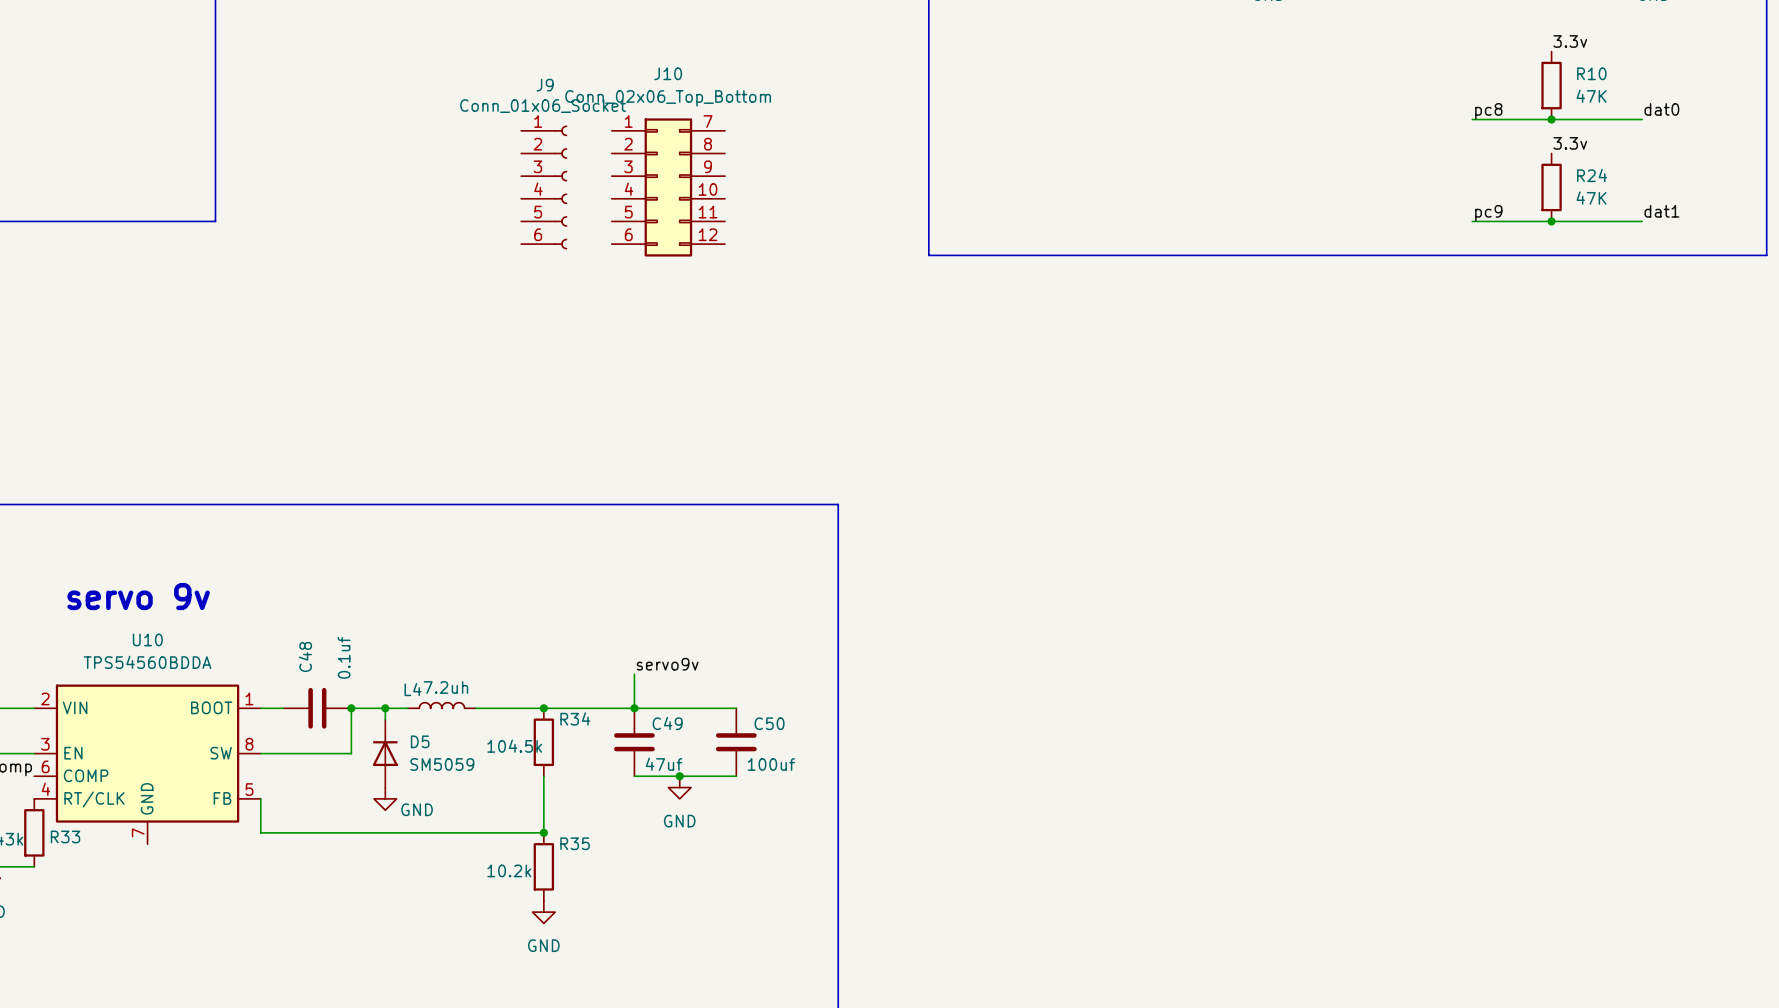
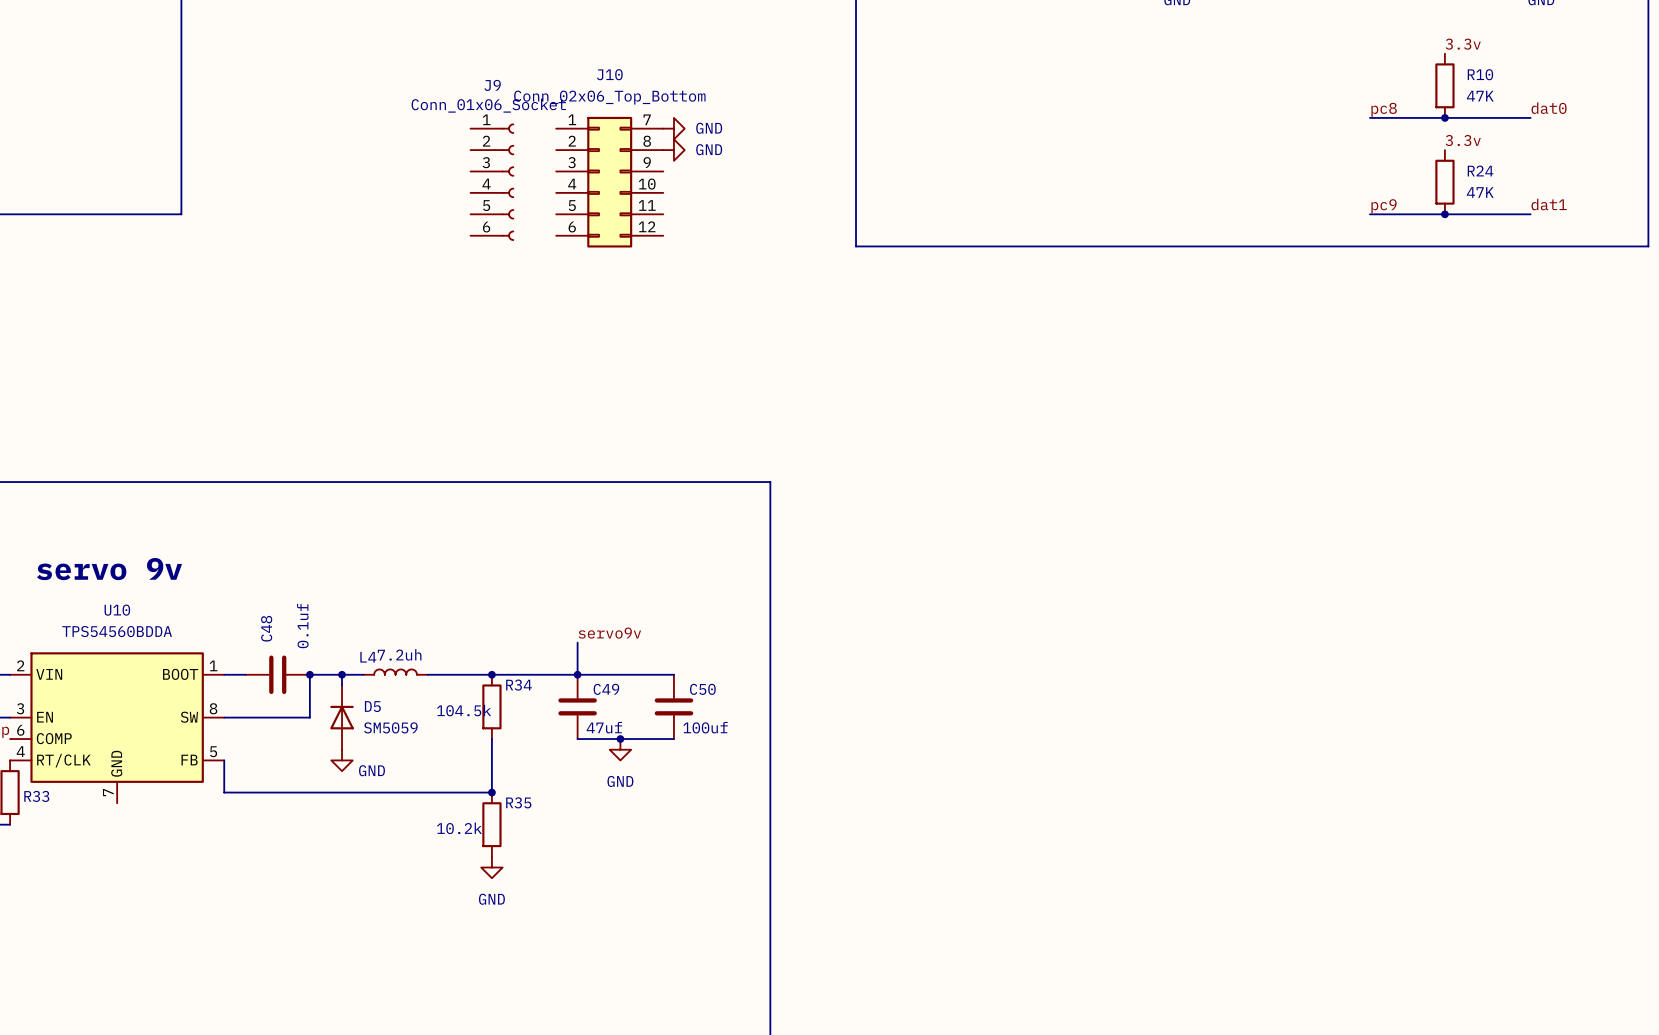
power symbol: none -> GND (673, 128)
power symbol: none -> GND (673, 150)

